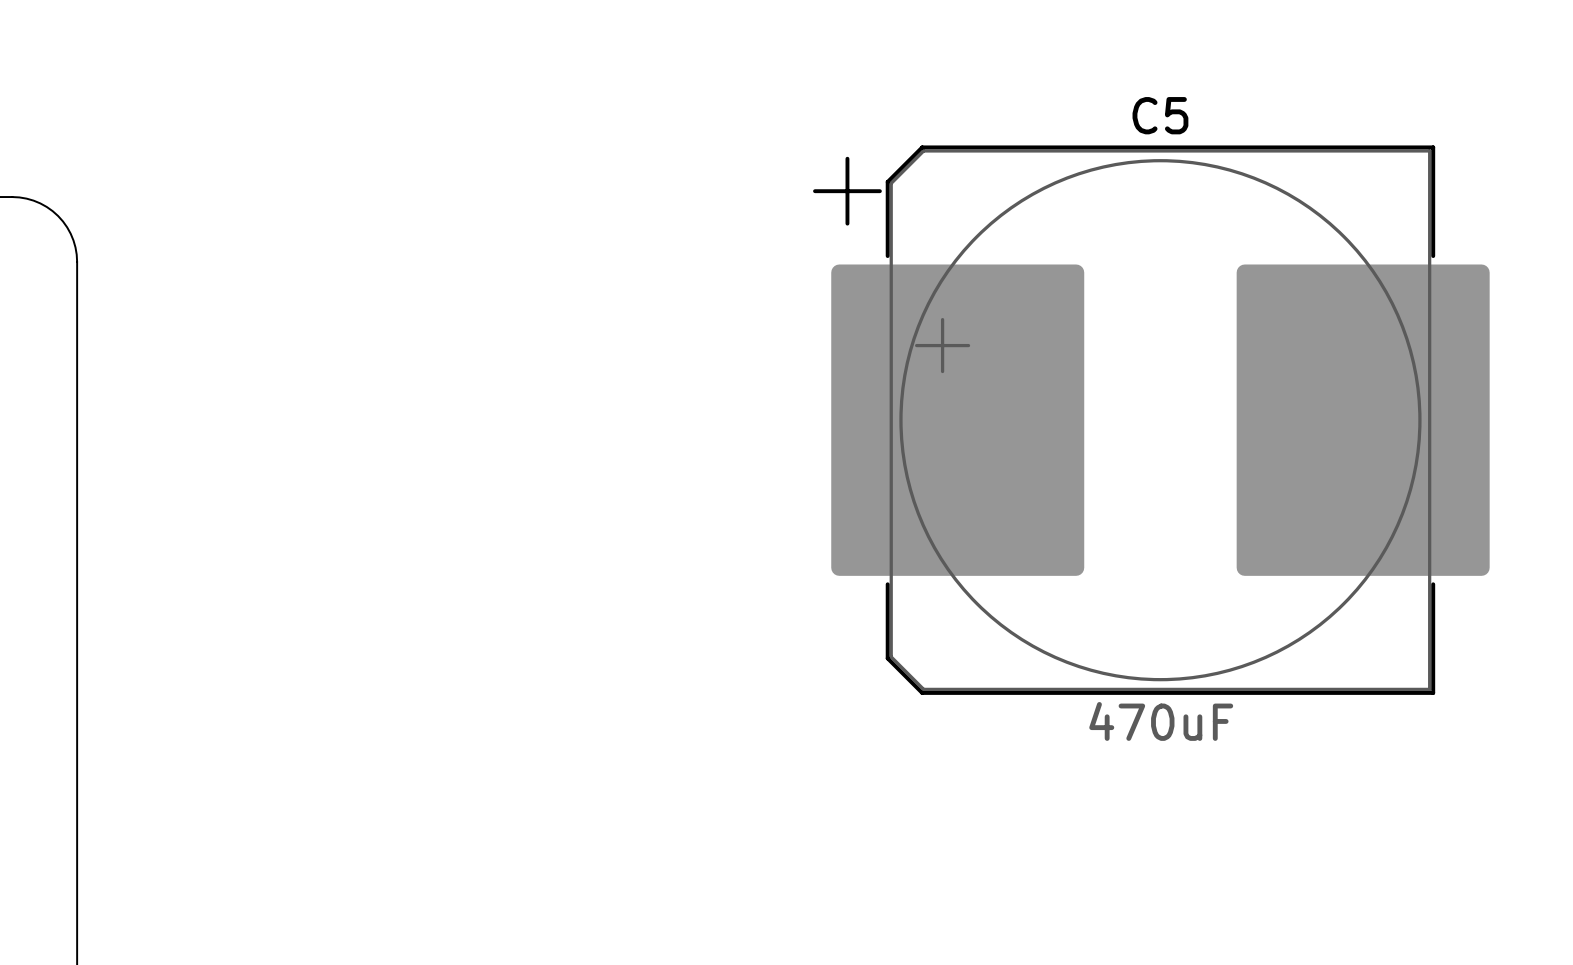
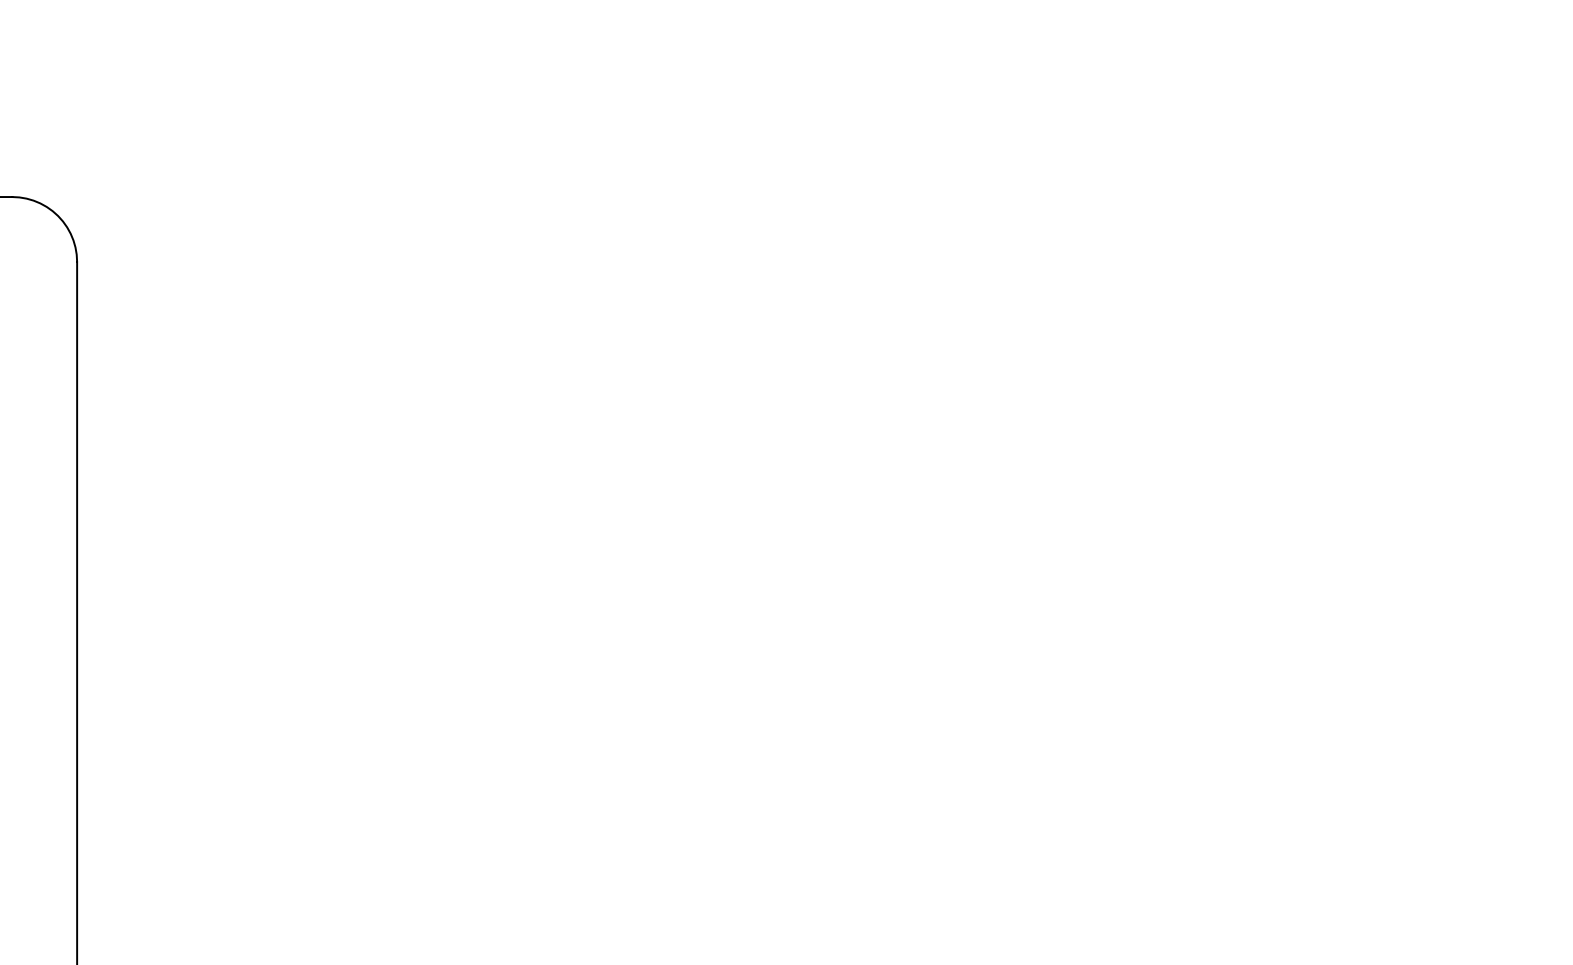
C5: 470uF (1151, 420) -> none

